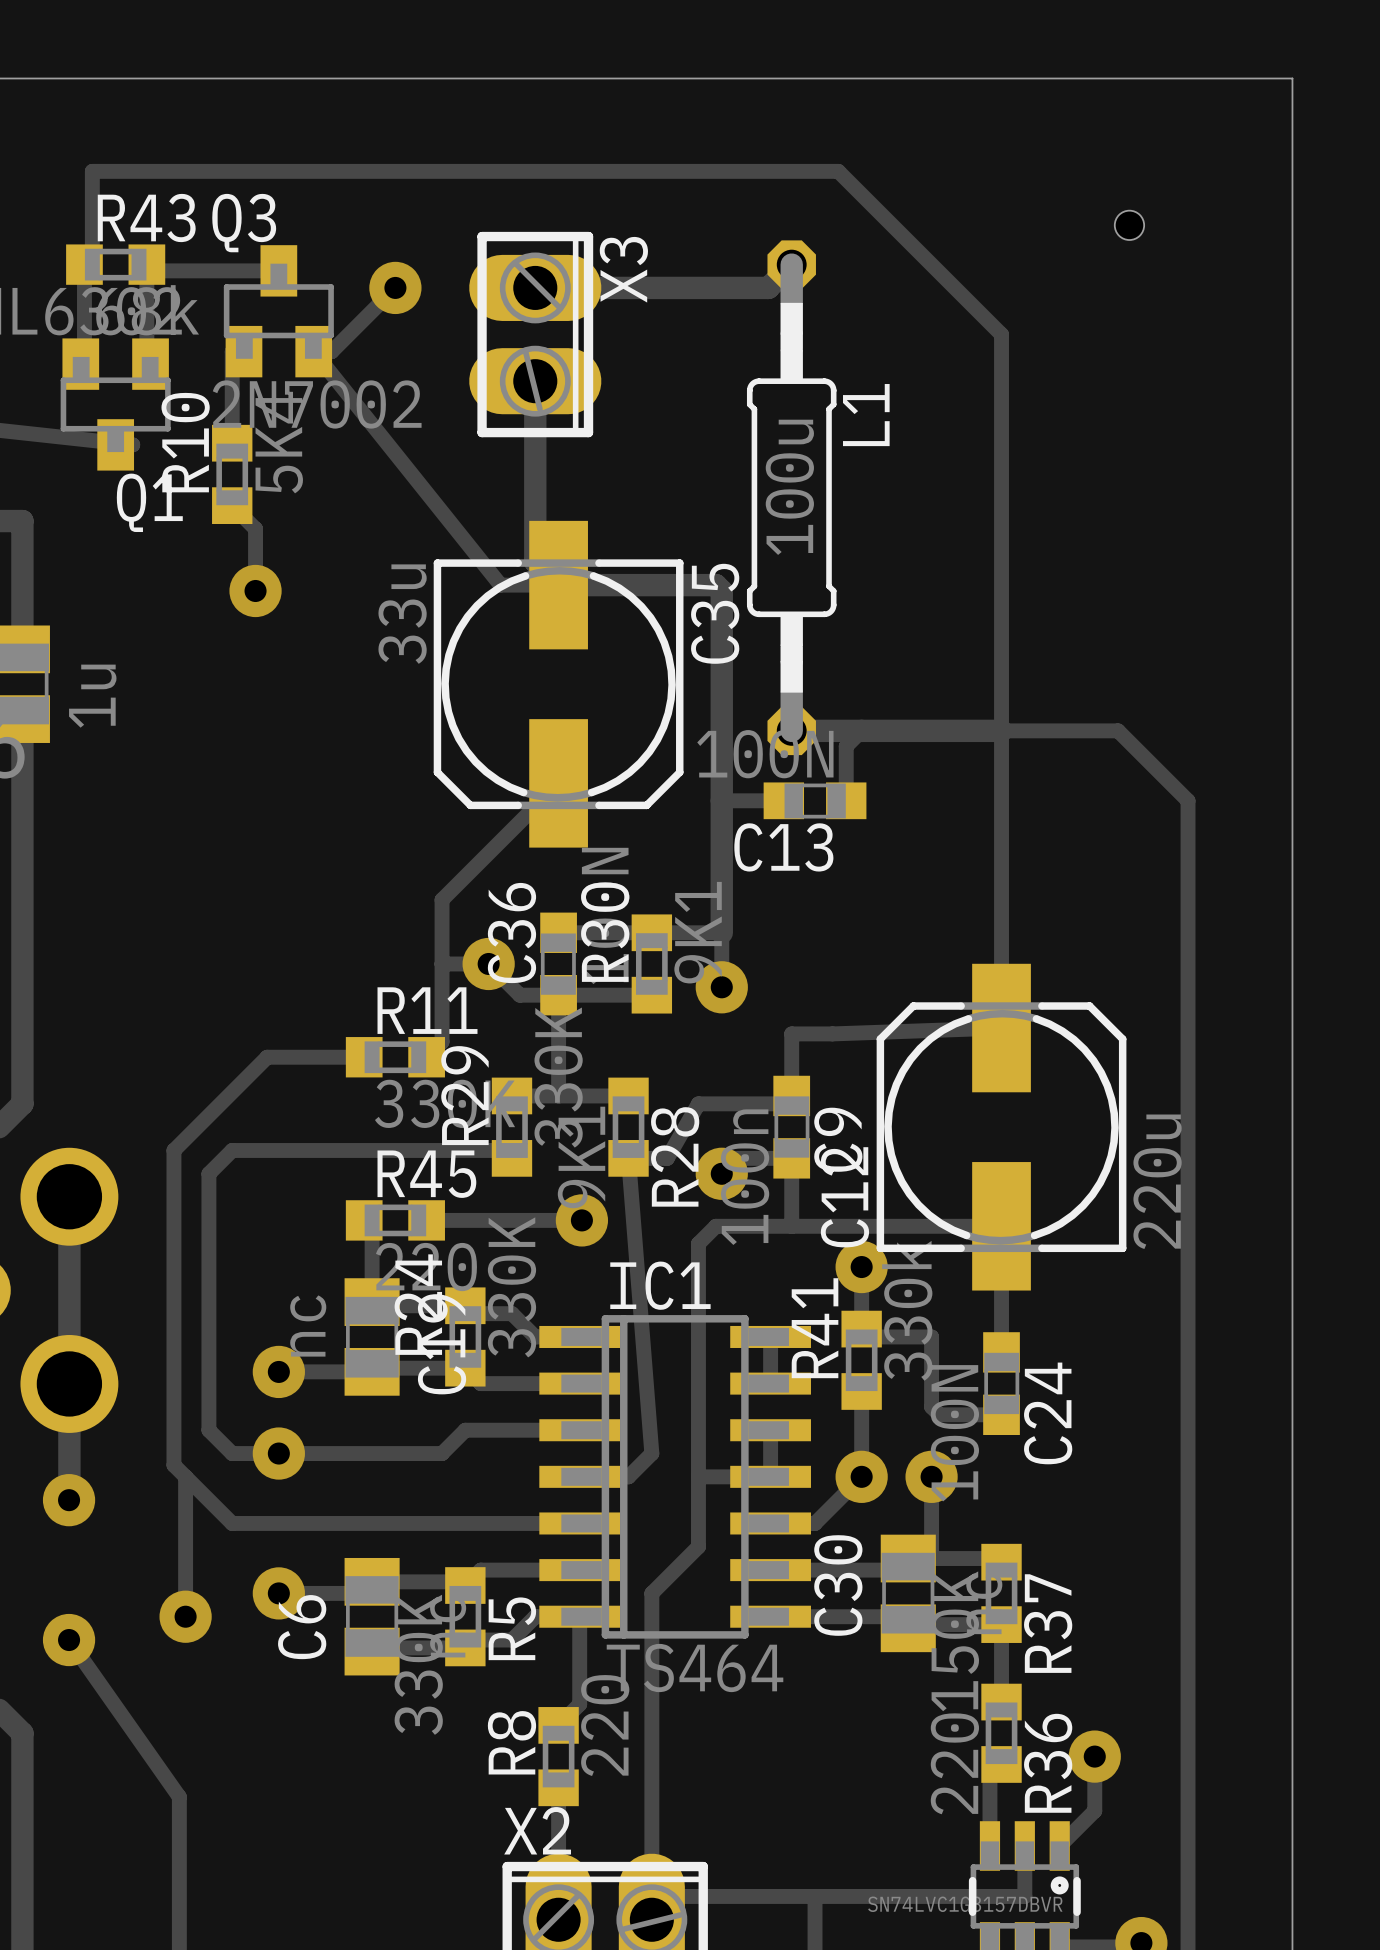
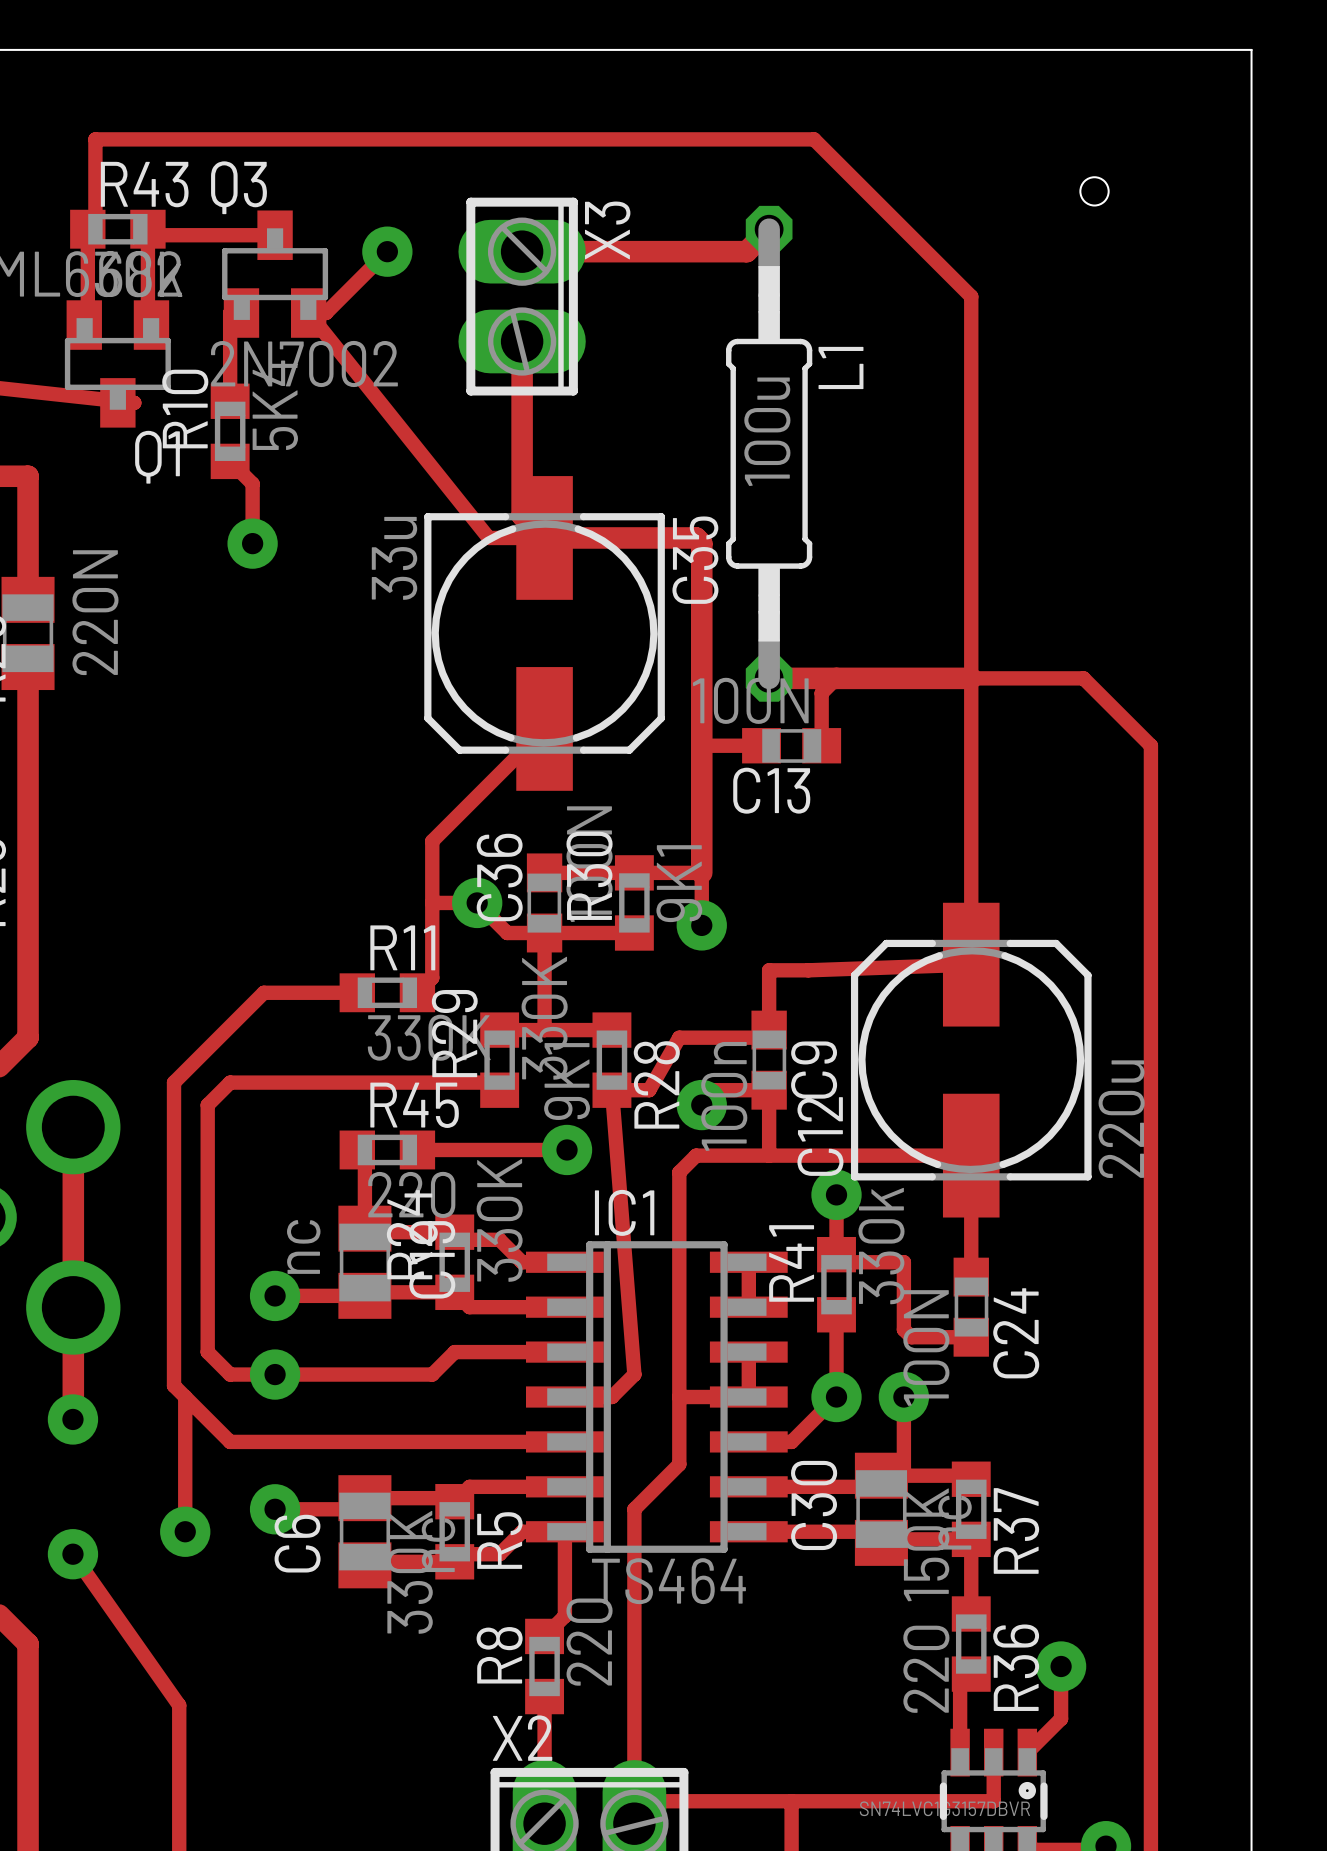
part value: 1u (92, 696) -> 220N (95, 612)

